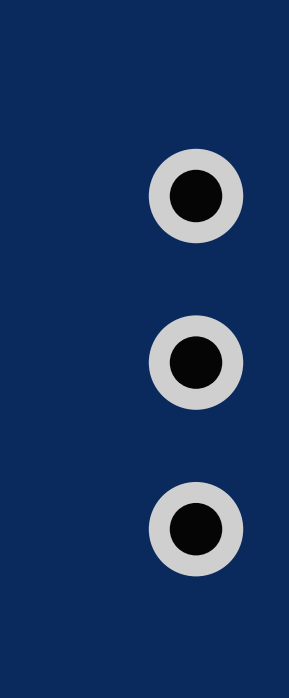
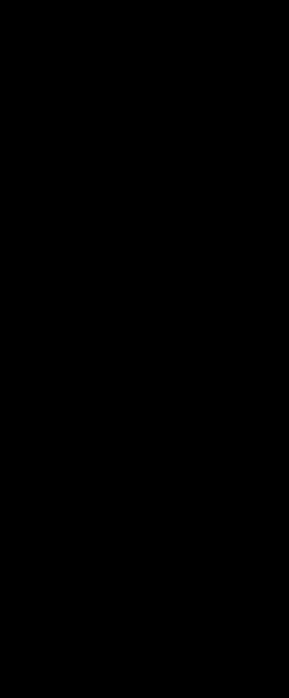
part: (196, 362) -> none

